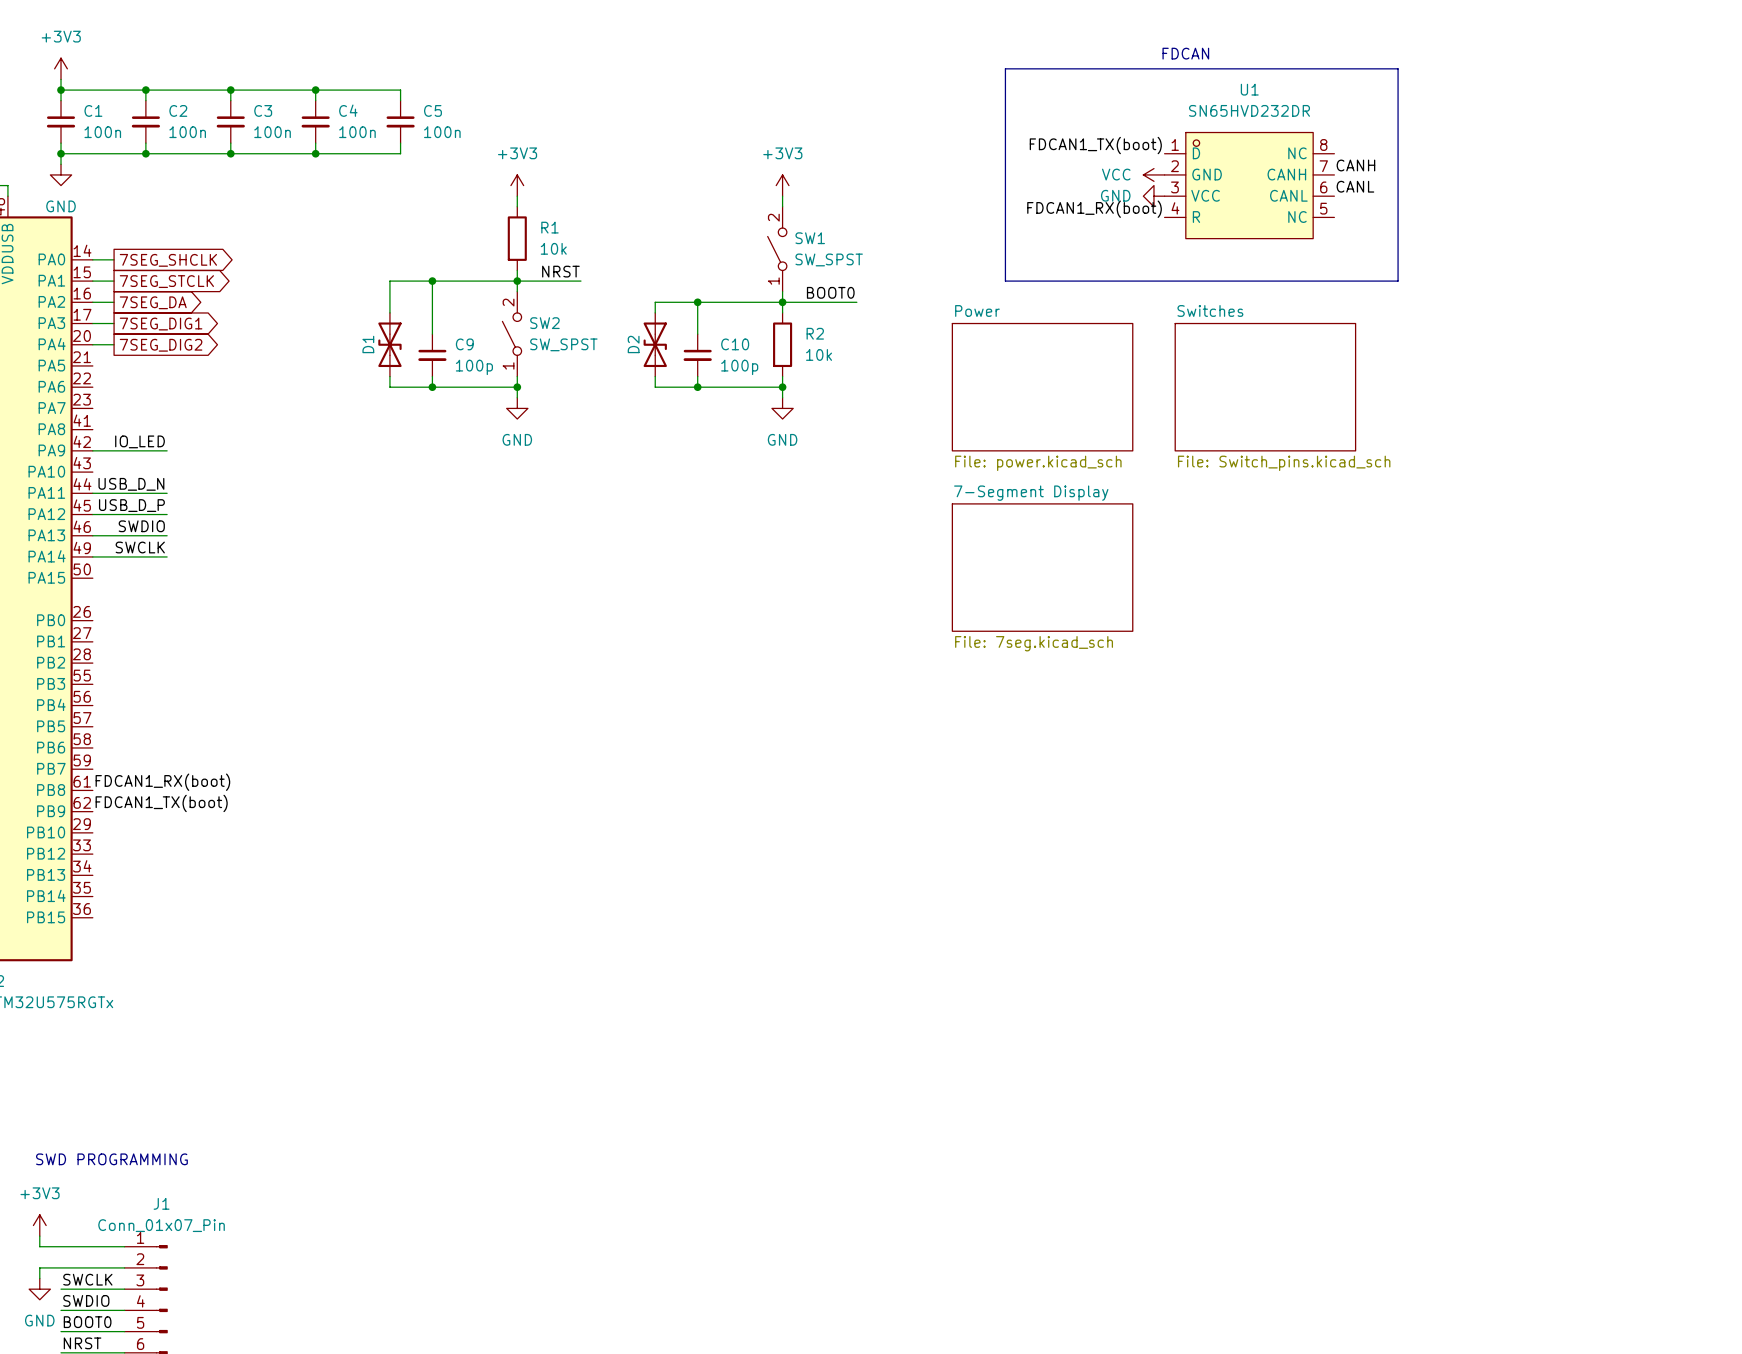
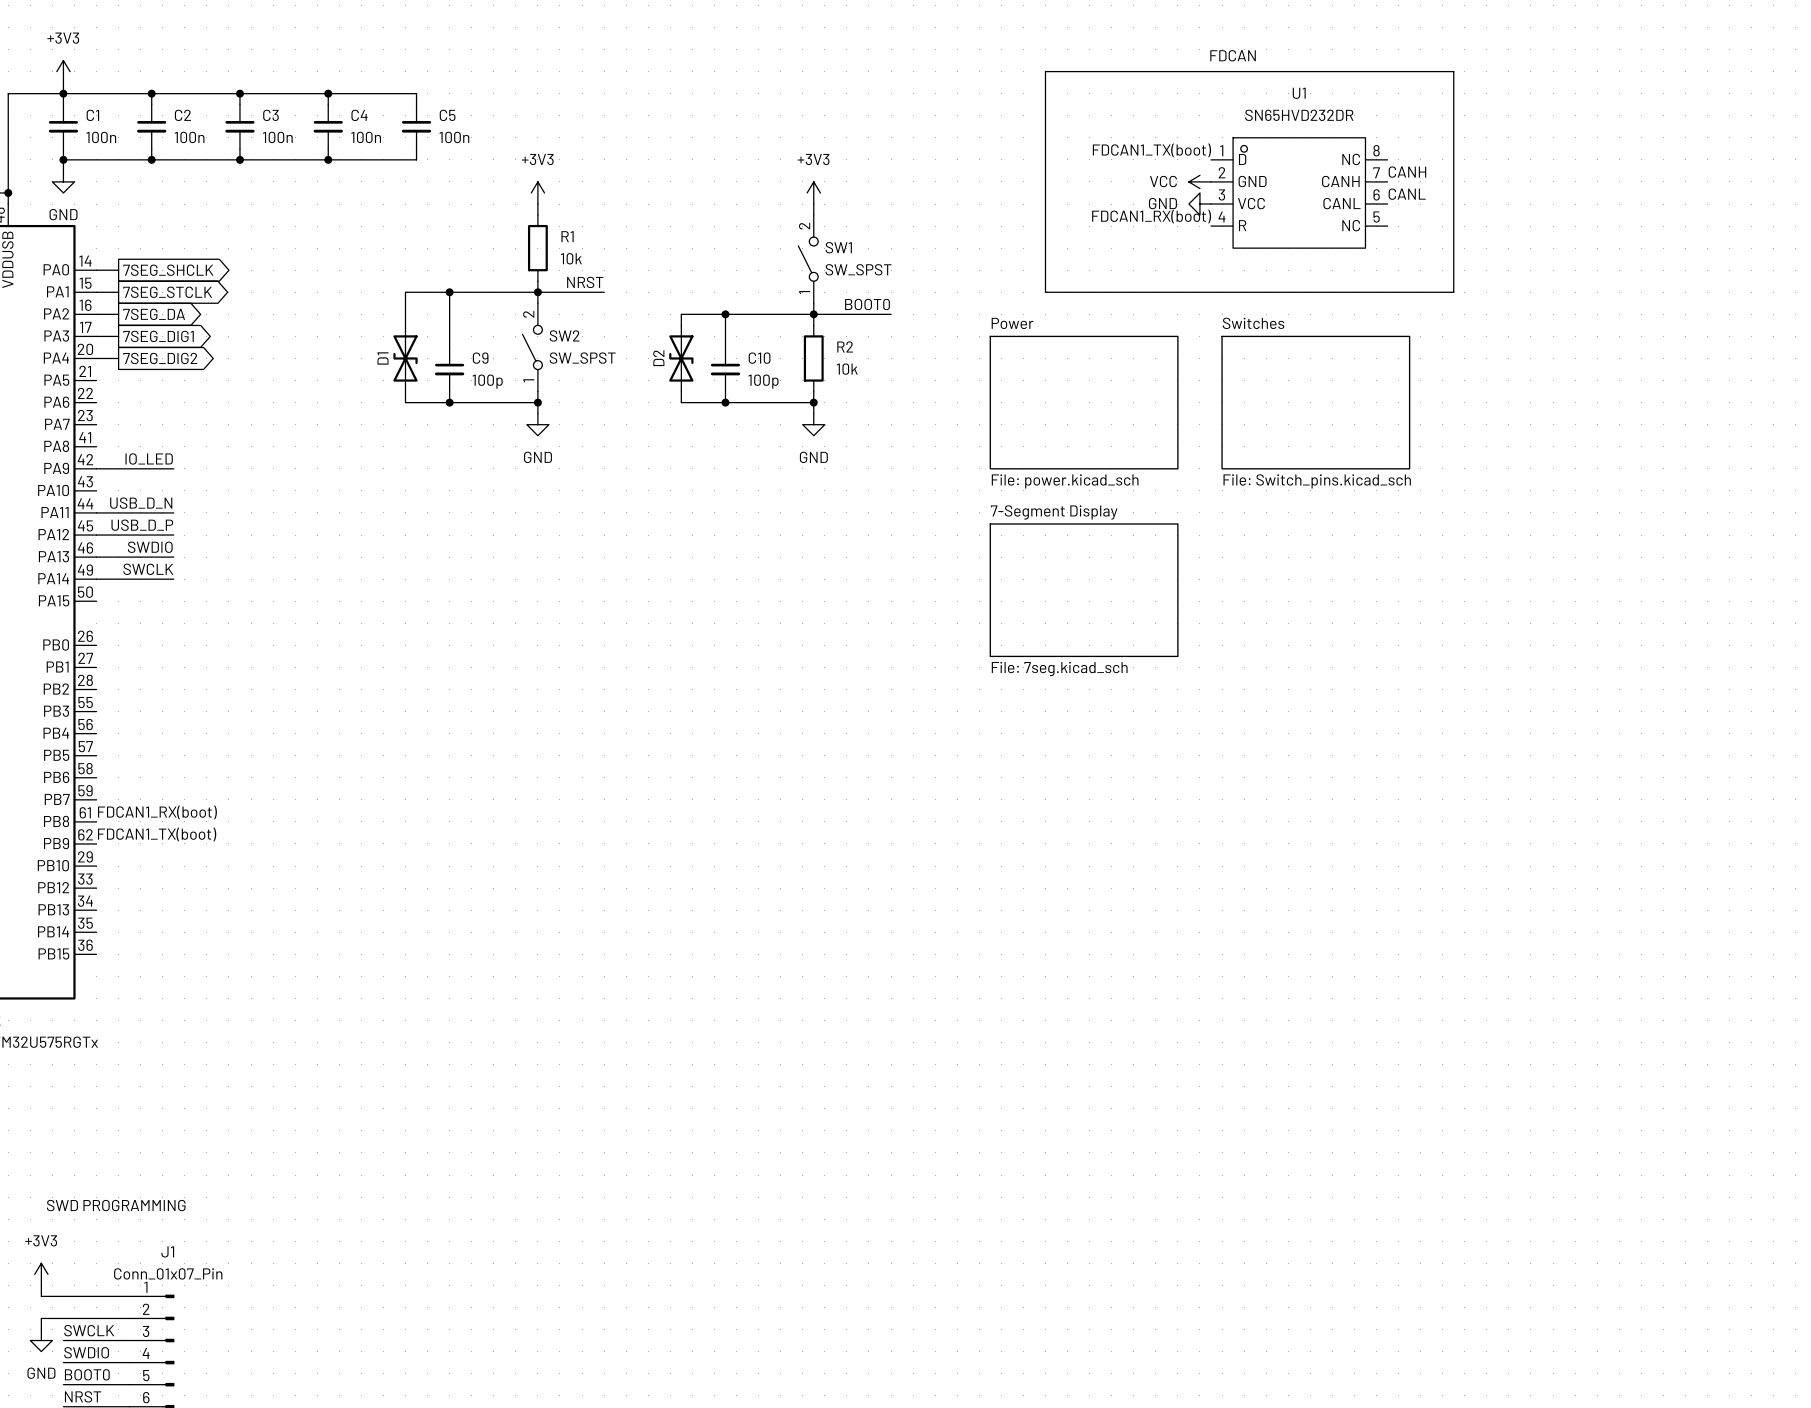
wire: none -> (63, 93) (8, 93) (8, 192)
junction: none -> (8, 192)

